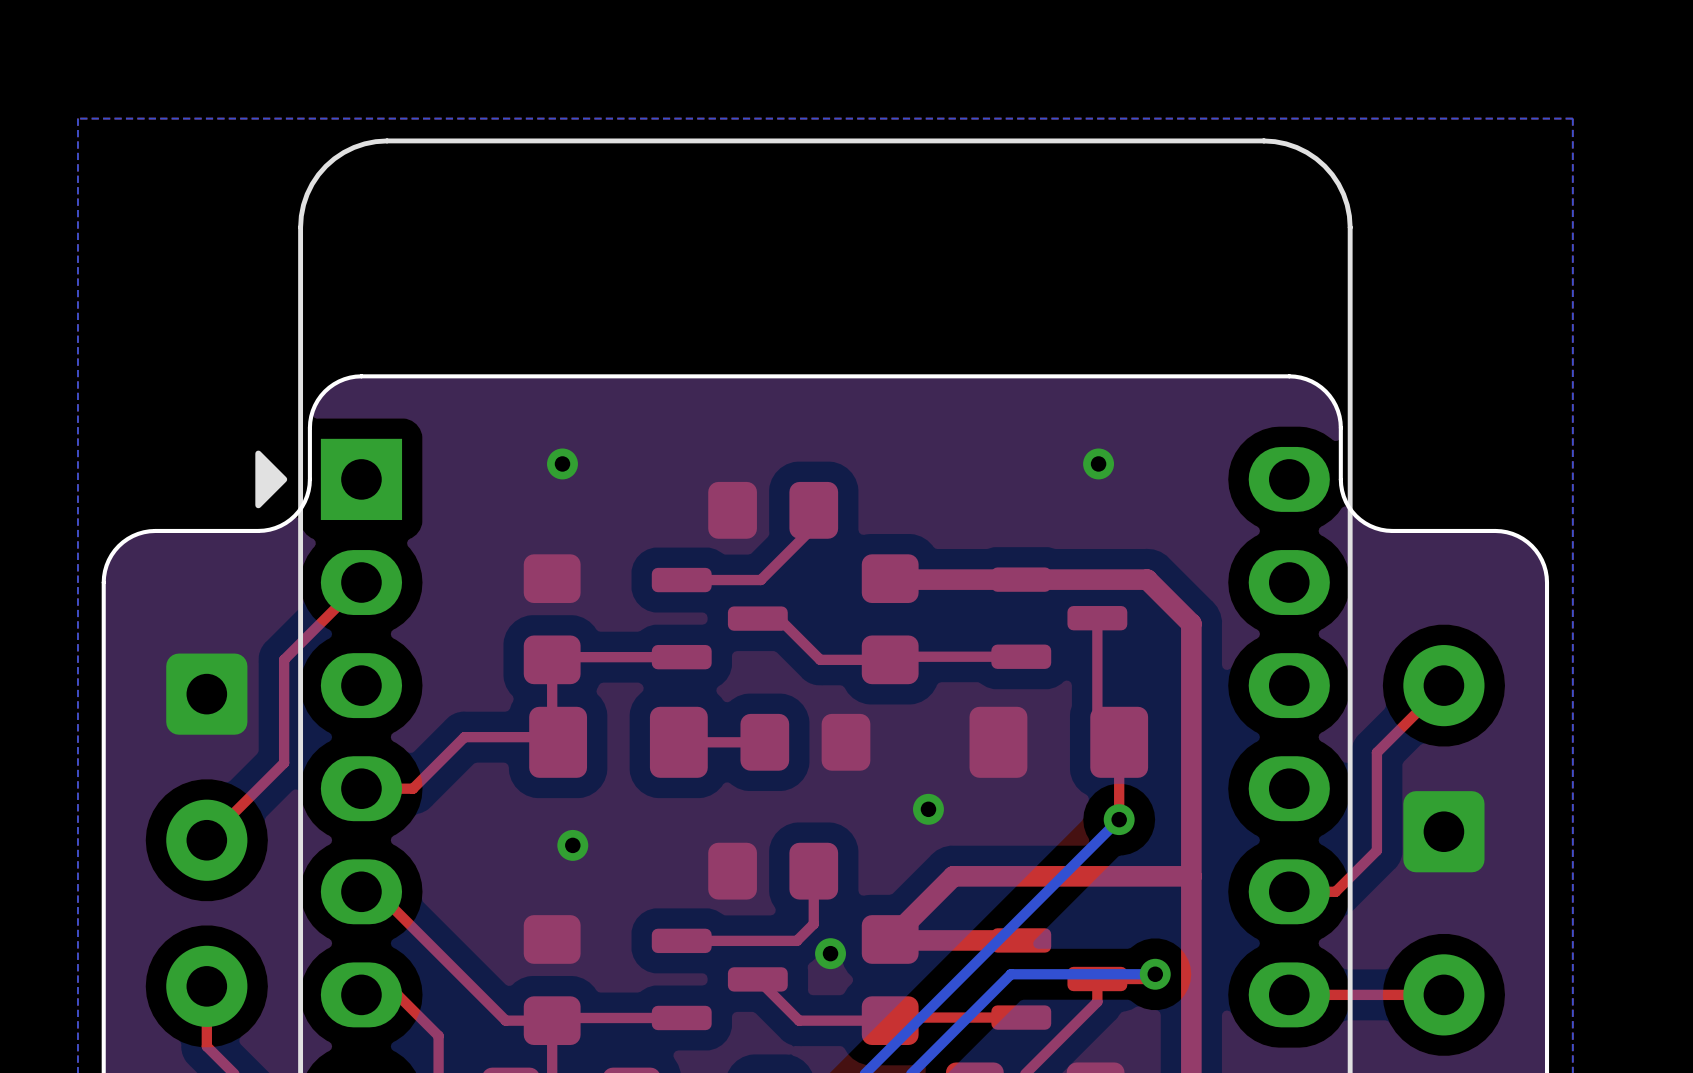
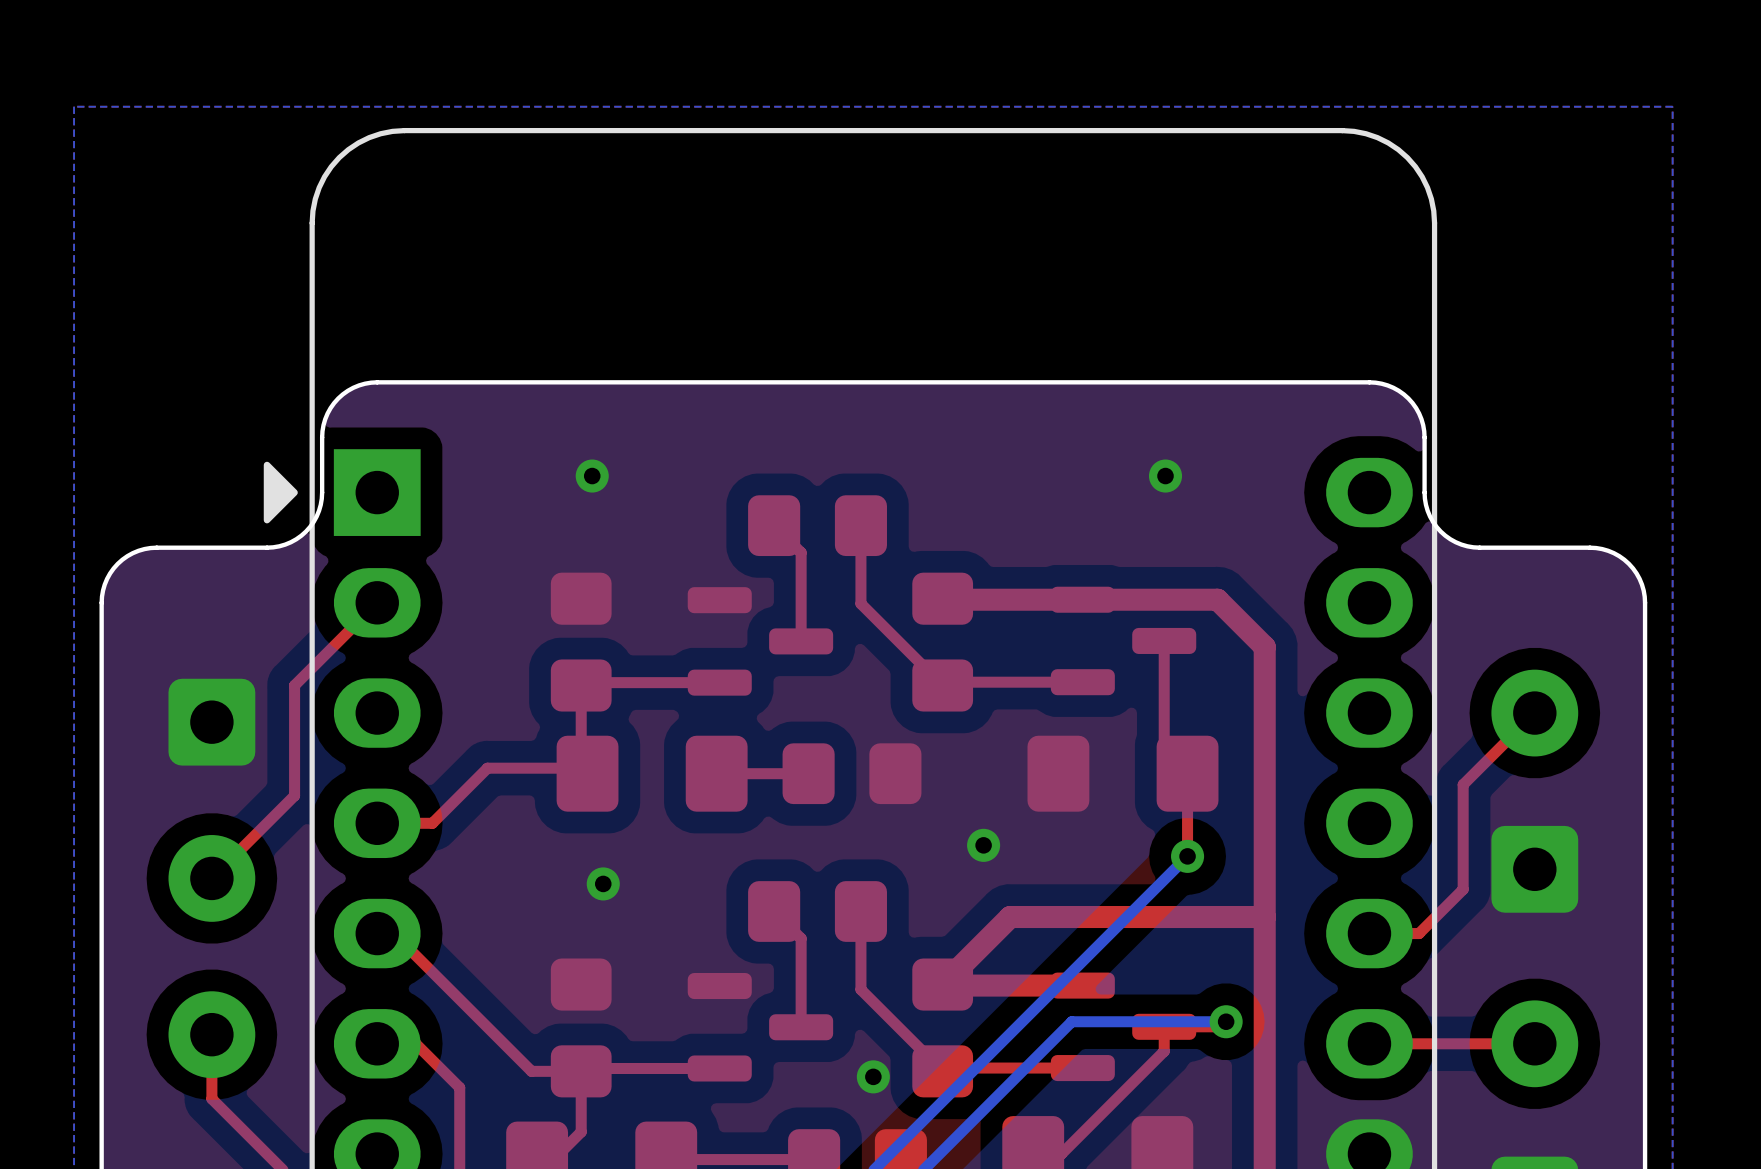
top track: none -> (774, 525) (801, 552) (801, 641)
top track: (813, 527) (760, 580) (681, 580) -> none
top track: (757, 618) (778, 618) (820, 659) (890, 659) -> (860, 543) (860, 603) (942, 685)
top track: none -> (774, 911) (801, 938) (801, 1027)
top track: (813, 924) (796, 940) (681, 940) -> none
via position: (830, 953) -> (873, 1076)
top track: (757, 979) (799, 1020) (890, 1020) -> (860, 968) (860, 989) (942, 1071)

